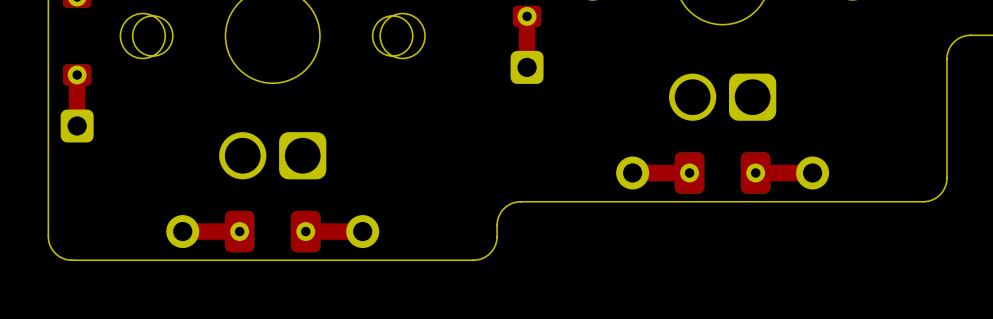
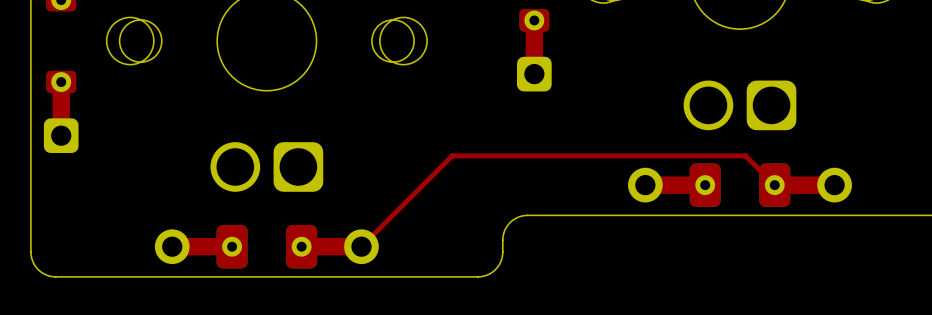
top track: none -> (834, 185) (774, 185) (745, 155) (452, 155) (361, 246) (301, 246)

